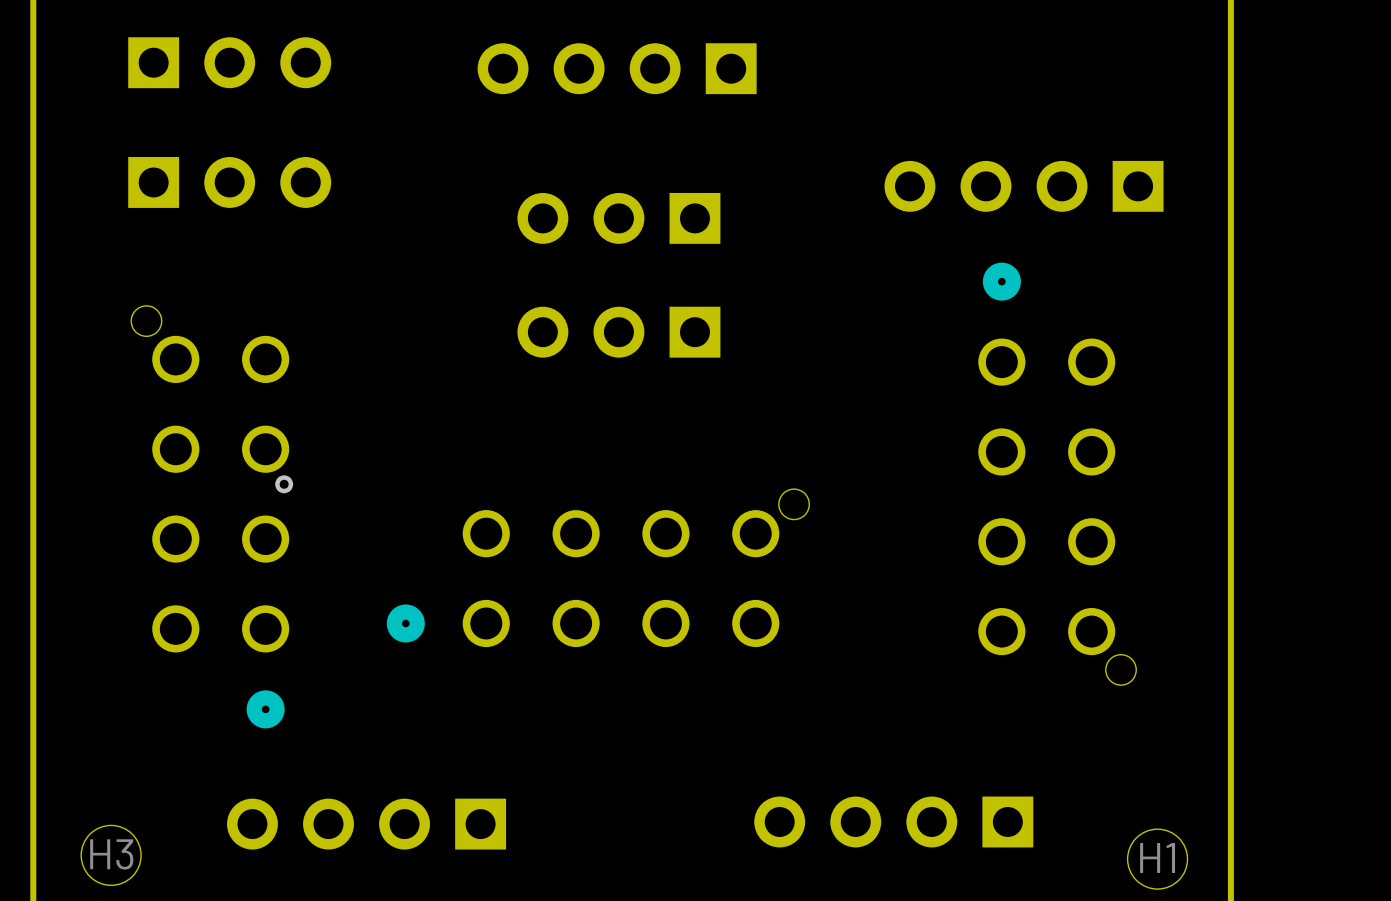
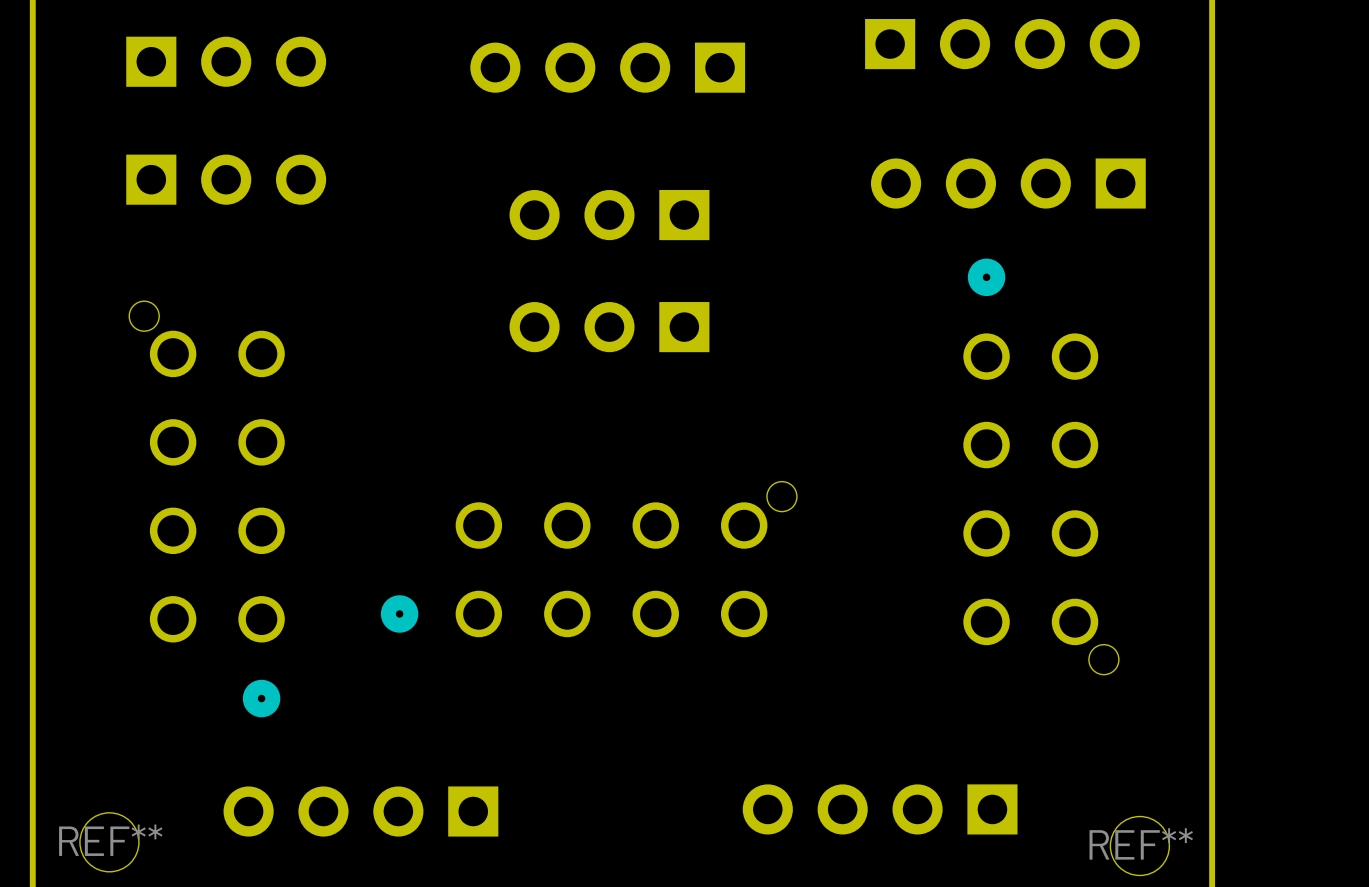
part: none -> (1002, 44)
via: (284, 484) -> none
H3 name: H3 (111, 854) -> REF** (110, 840)
H1 name: H1 (1157, 858) -> REF** (1141, 843)

